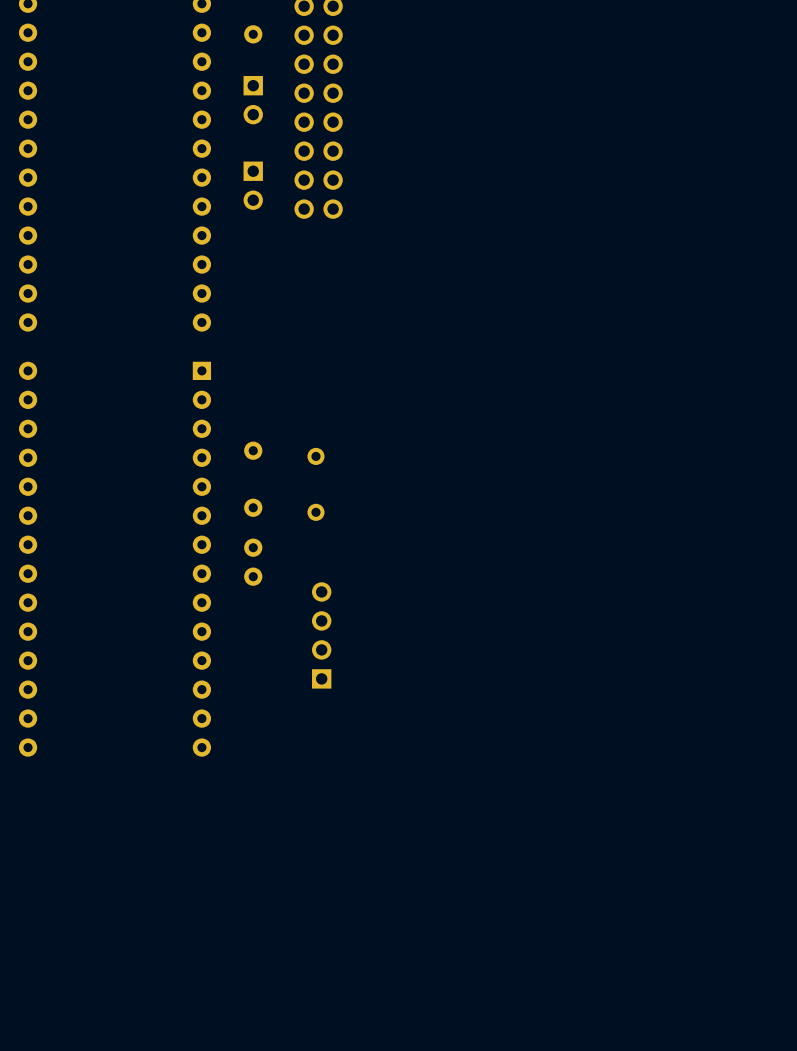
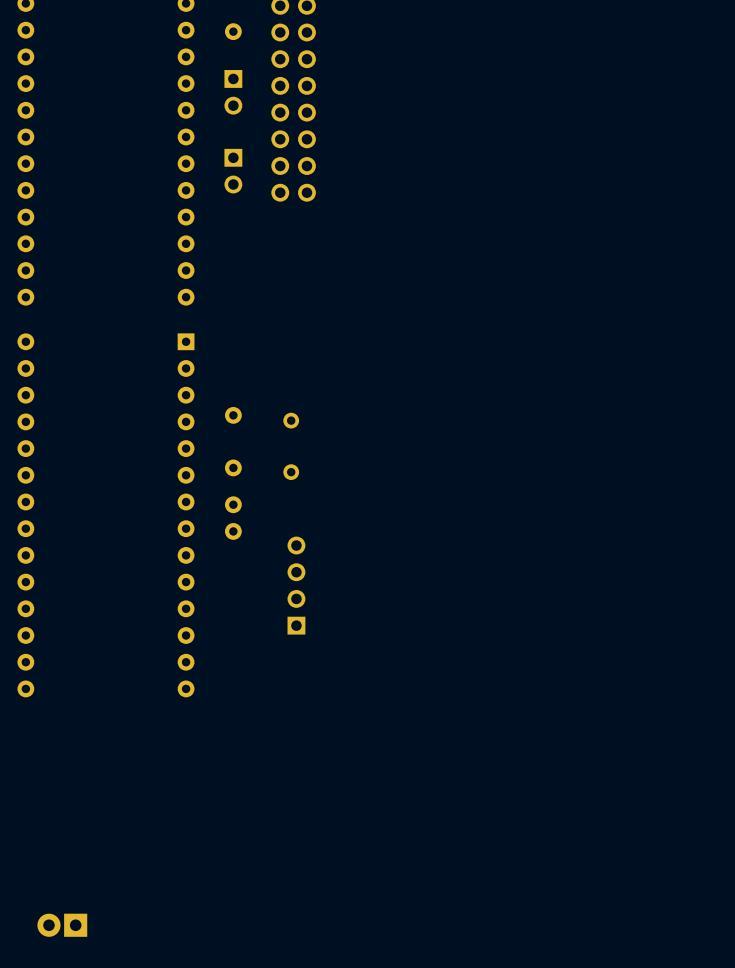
part: none -> (62, 925)

